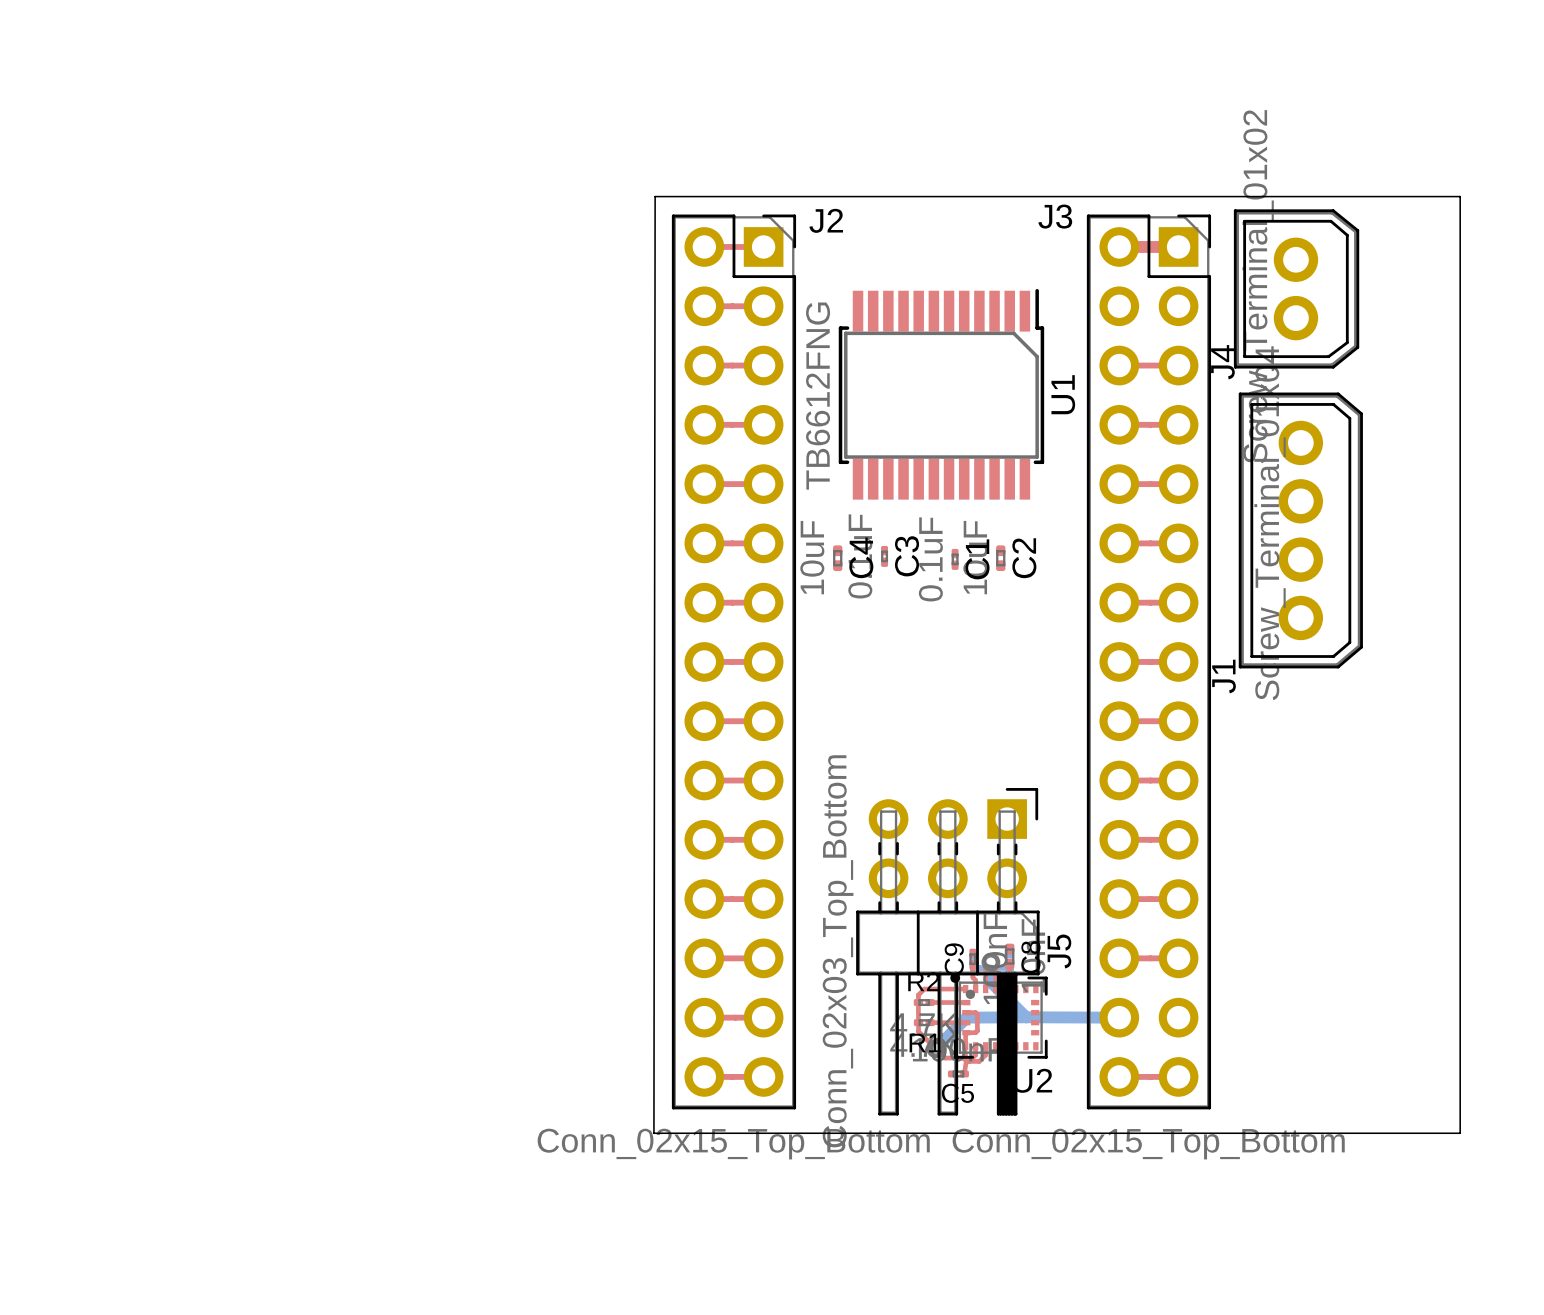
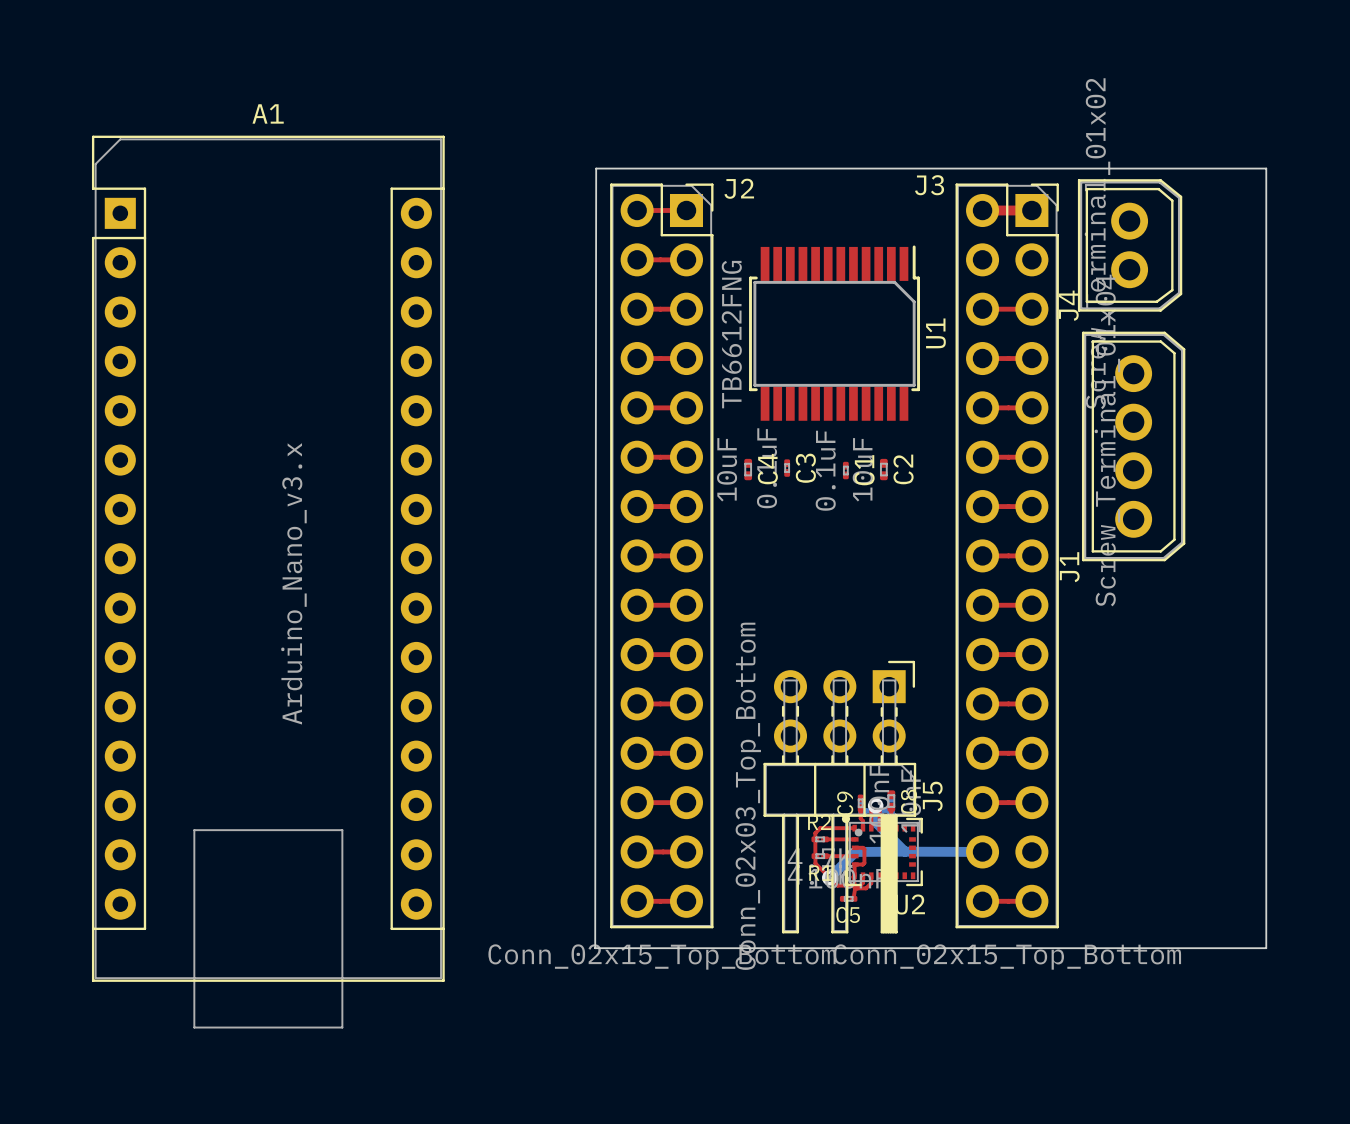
A1: none -> Arduino_Nano_v3.x (268, 582)

